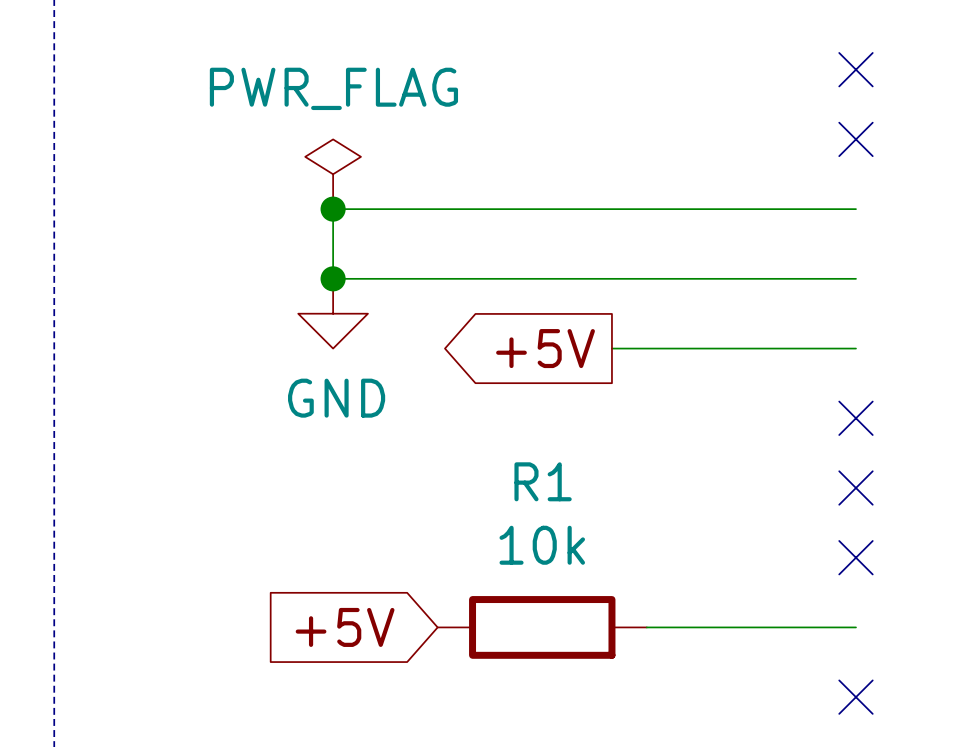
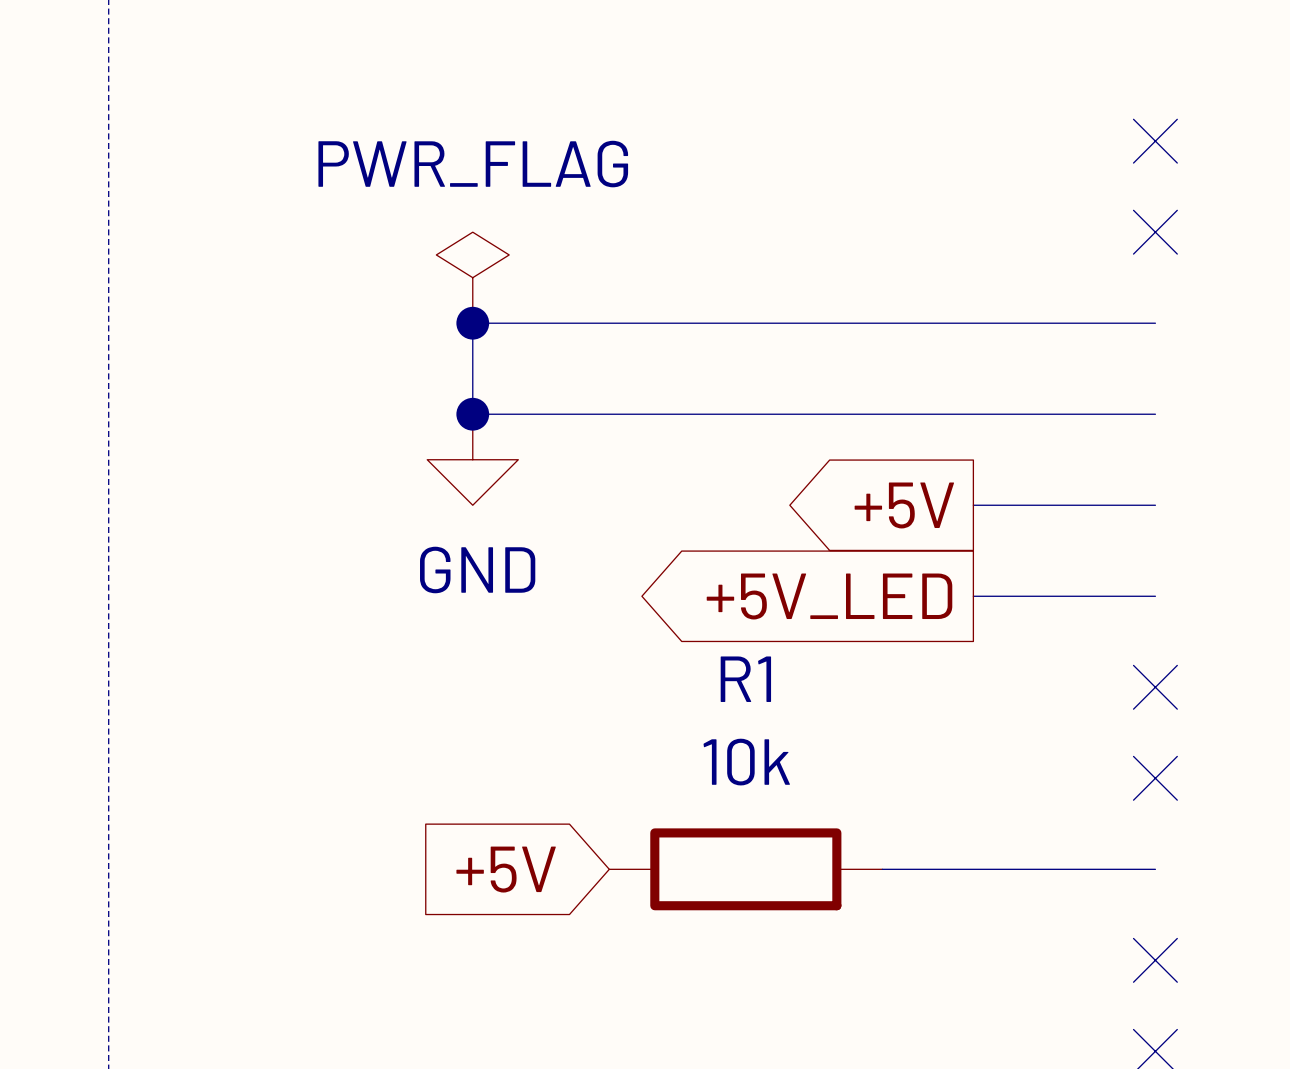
global label position: +5V (545, 348) -> +5V (904, 505)
wire: (611, 348) (716, 348) -> none
wire: none -> (973, 596) (1155, 596)
no-connect mark: (855, 418) -> none
global label: none -> +5V_LED (829, 596)

